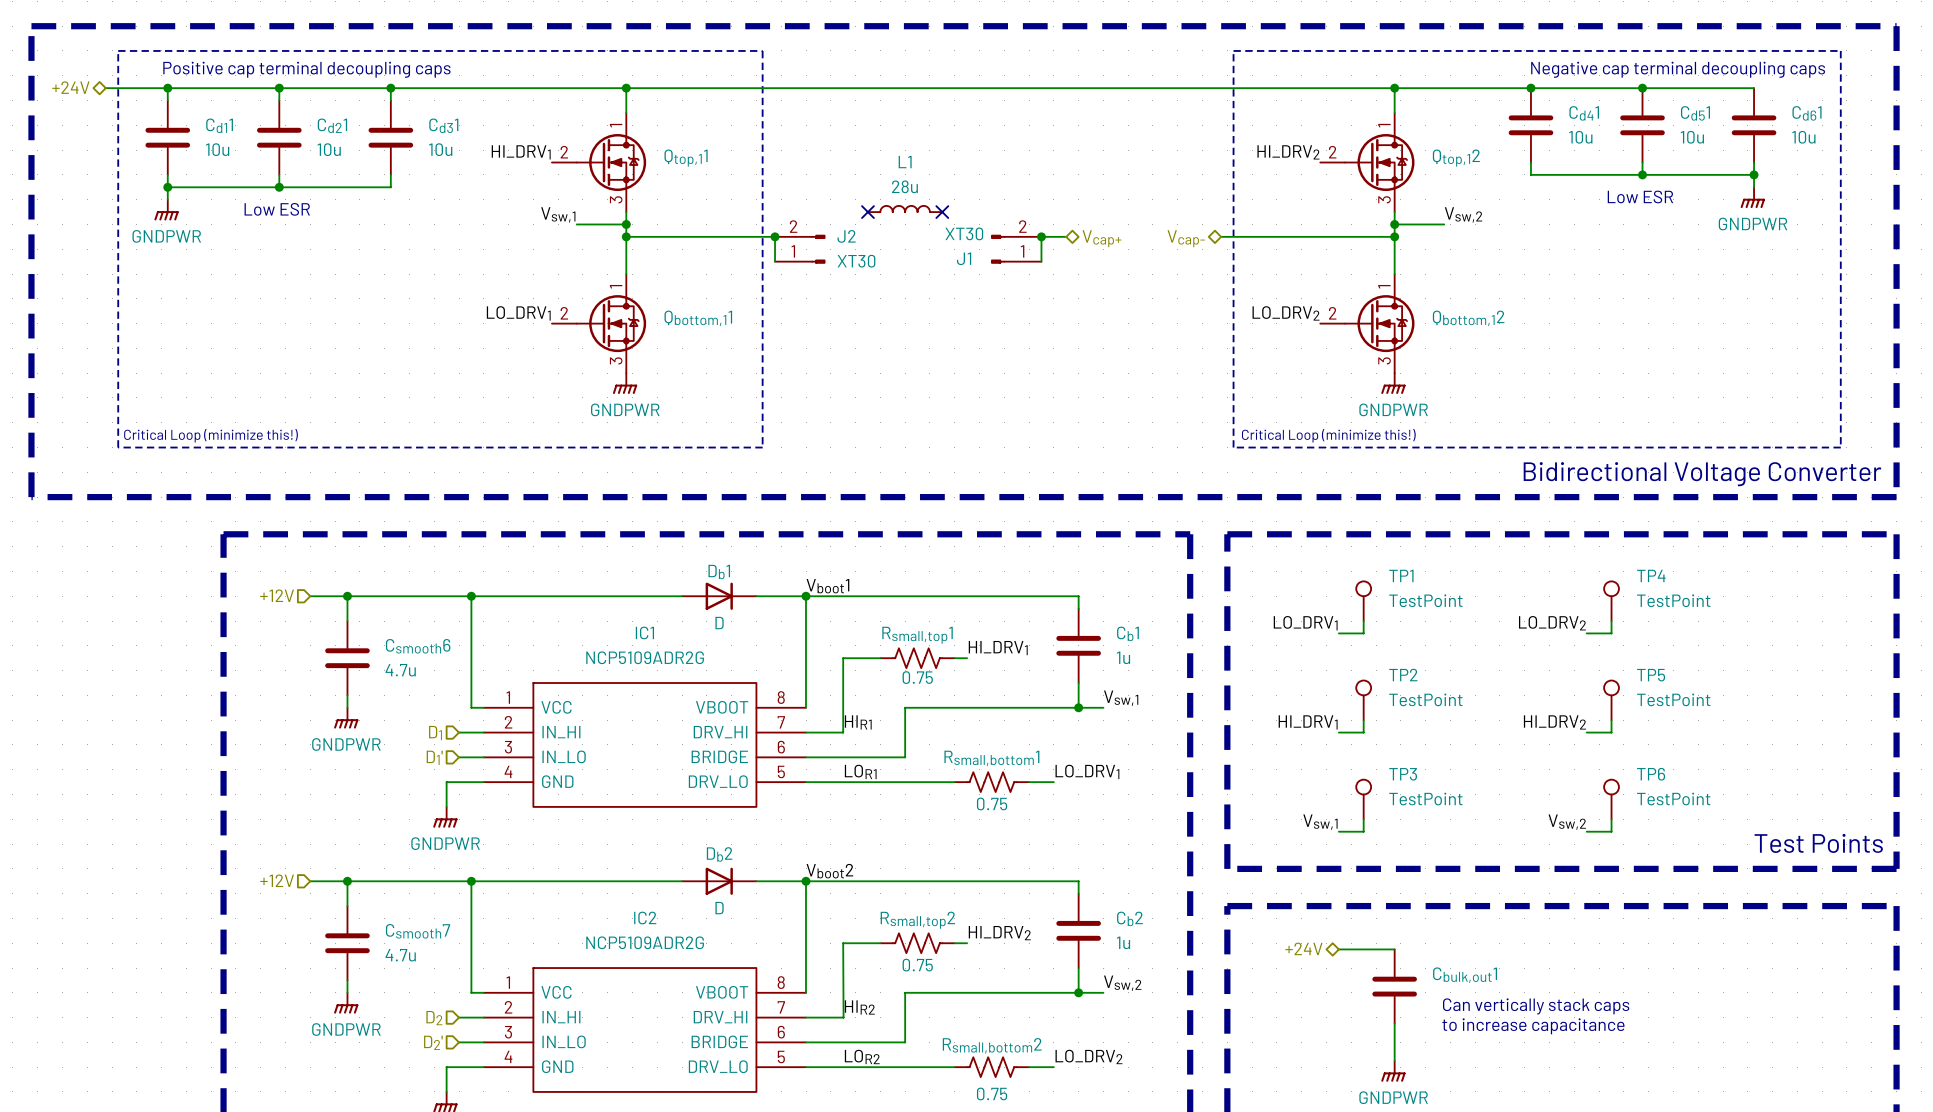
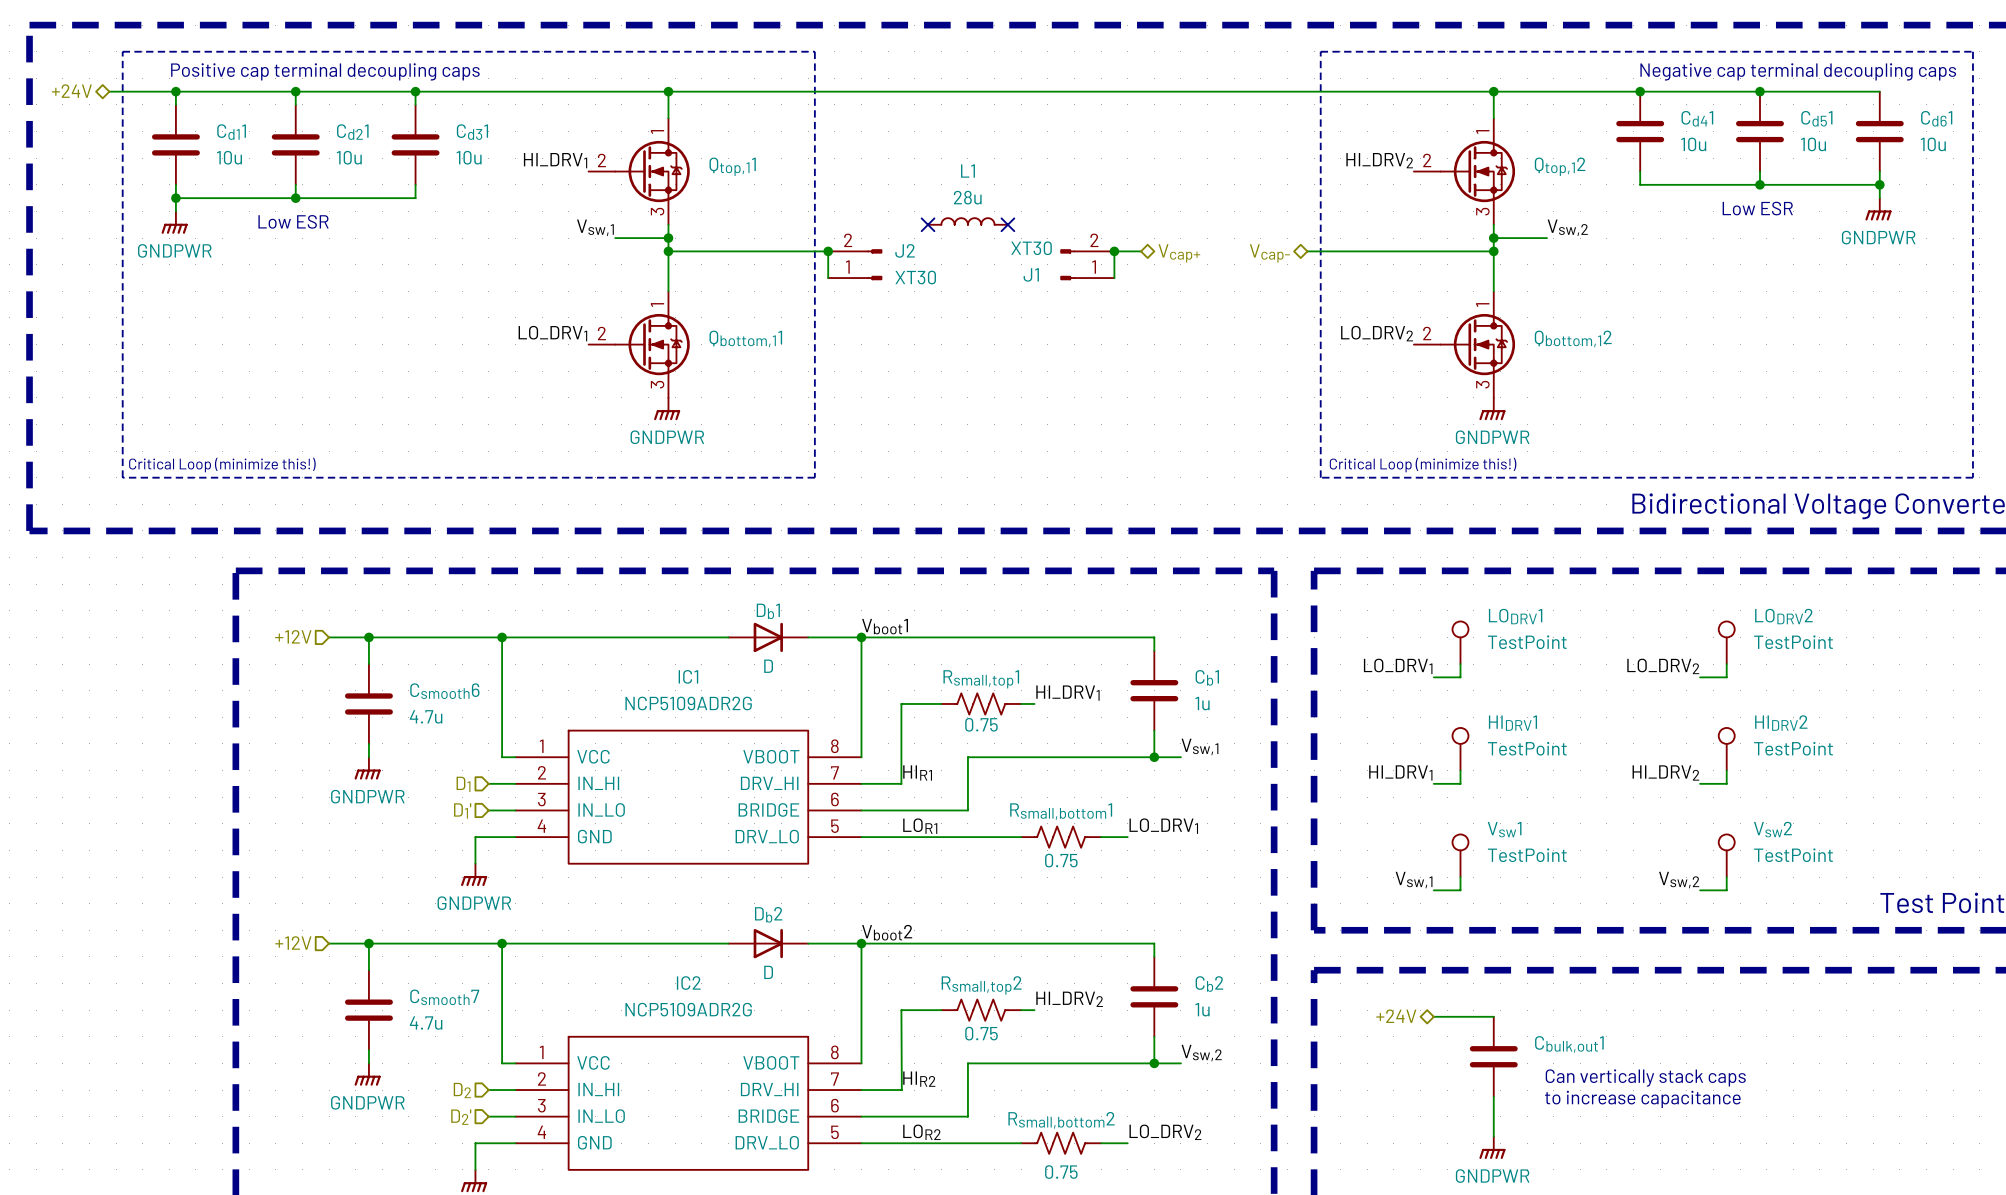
TP1 name: TP1 (1401, 575) -> LODRV1 (1515, 616)
TP4 name: TP4 (1651, 575) -> LODRV2 (1783, 616)
TP2 name: TP2 (1403, 675) -> HIDRV1 (1512, 723)
TP5 name: TP5 (1651, 675) -> HIDRV2 (1781, 723)
TP3 name: TP3 (1403, 774) -> Vsw1 (1504, 829)
TP6 name: TP6 (1651, 774) -> Vsw2 (1772, 829)

